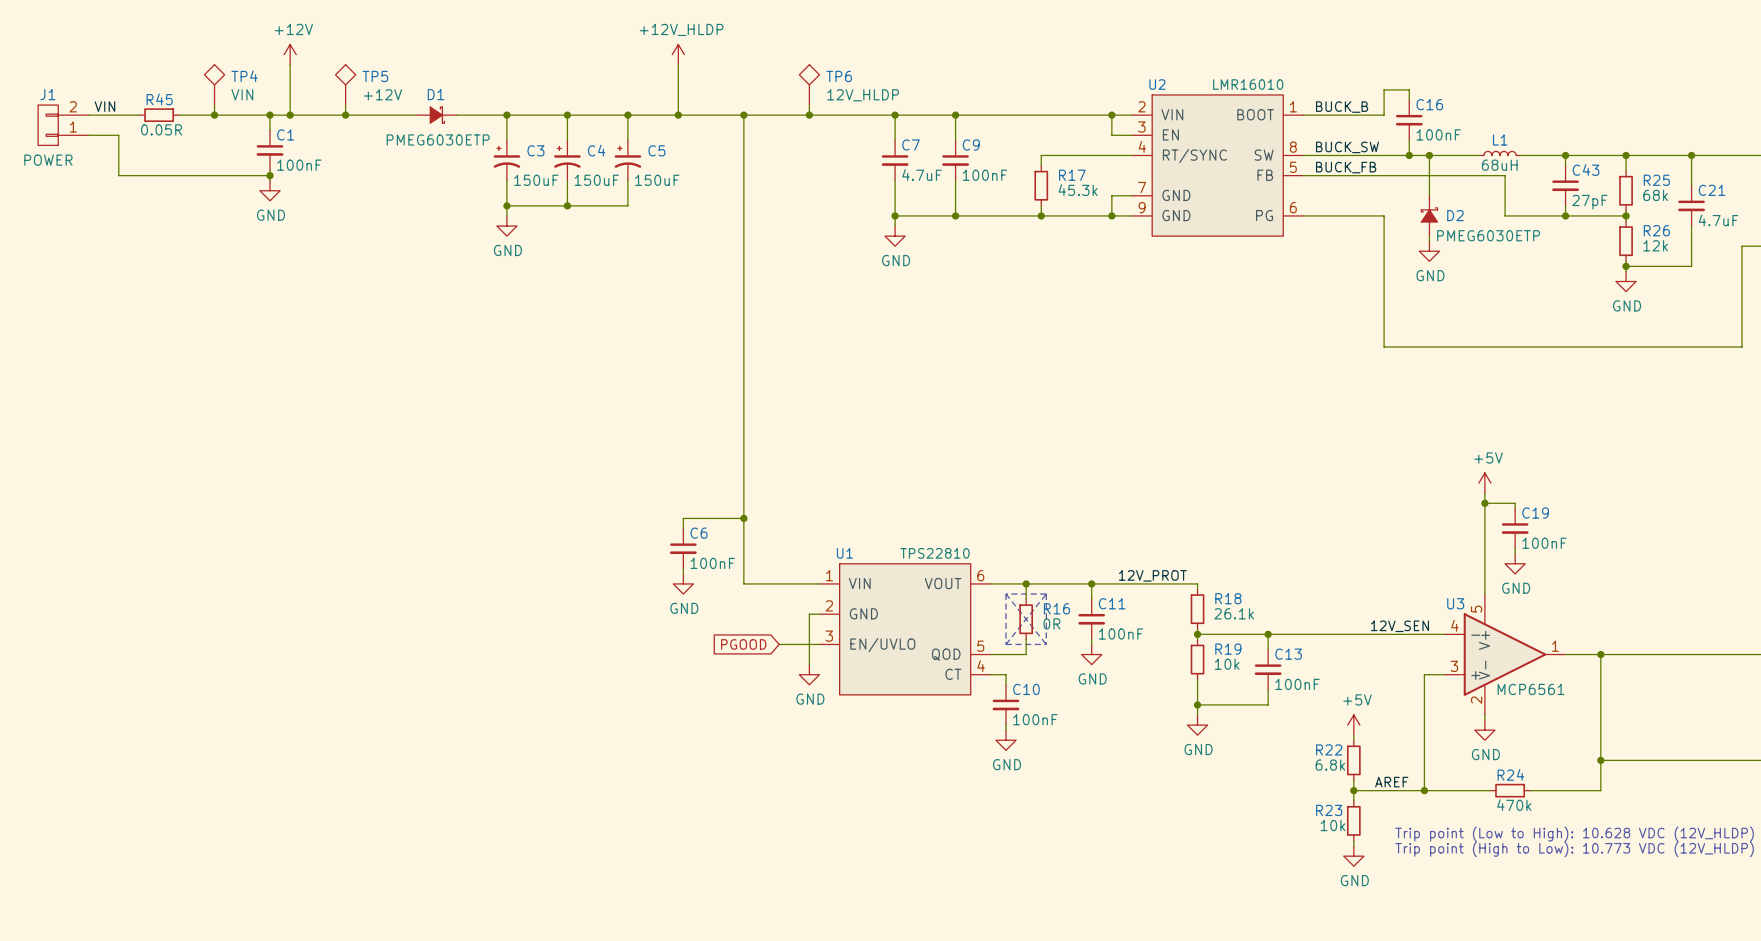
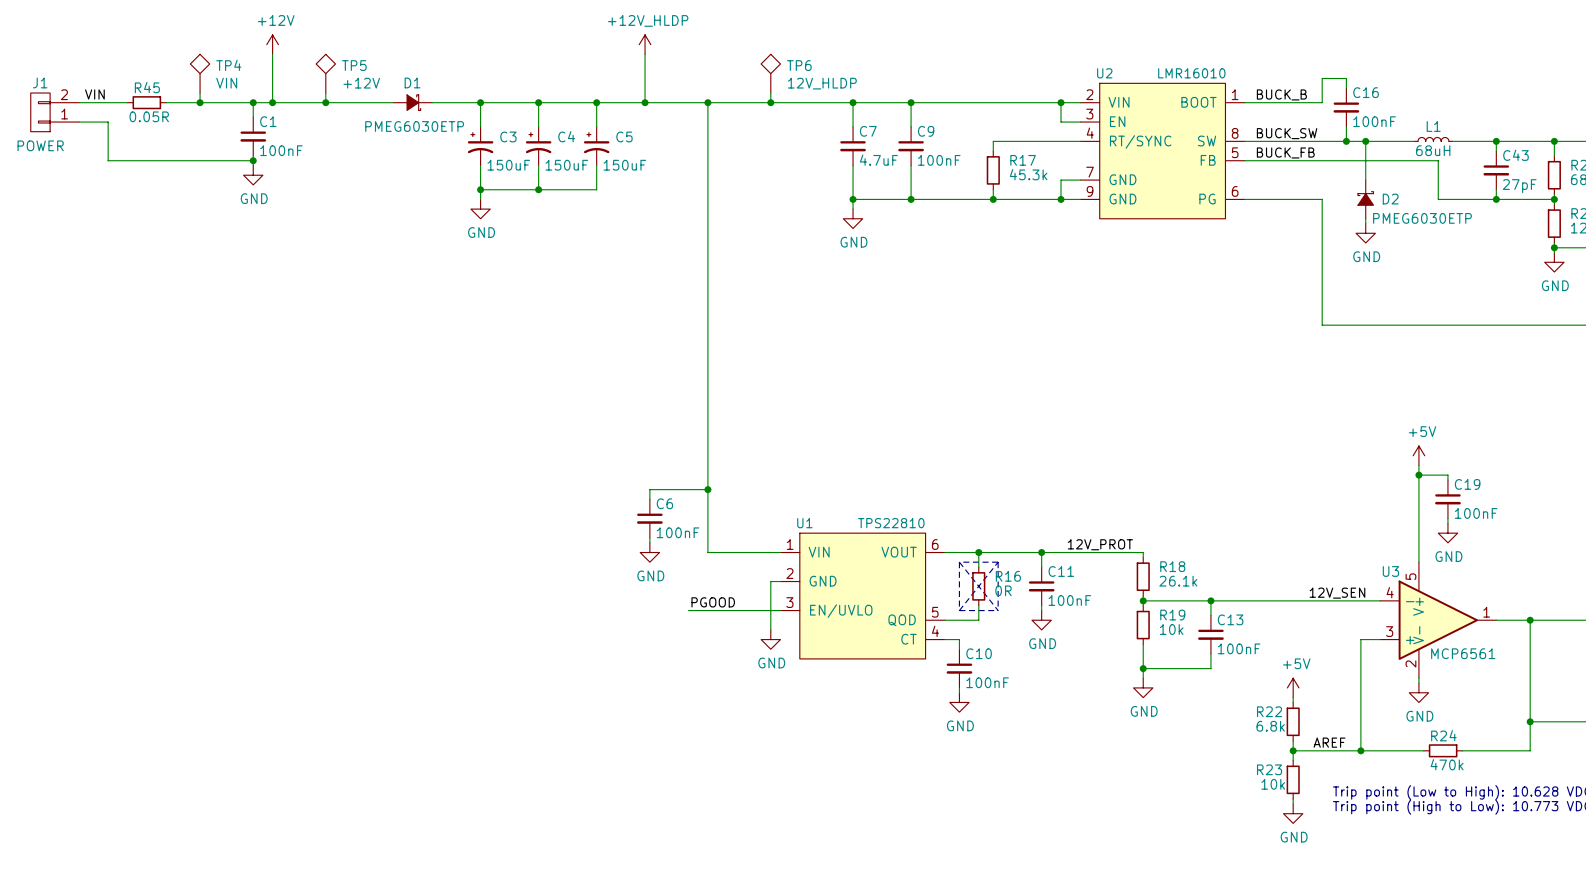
label: none -> PGOOD (713, 602)
wire: none -> (688, 610) (741, 610)
global label: PGOOD (743, 644) -> none

